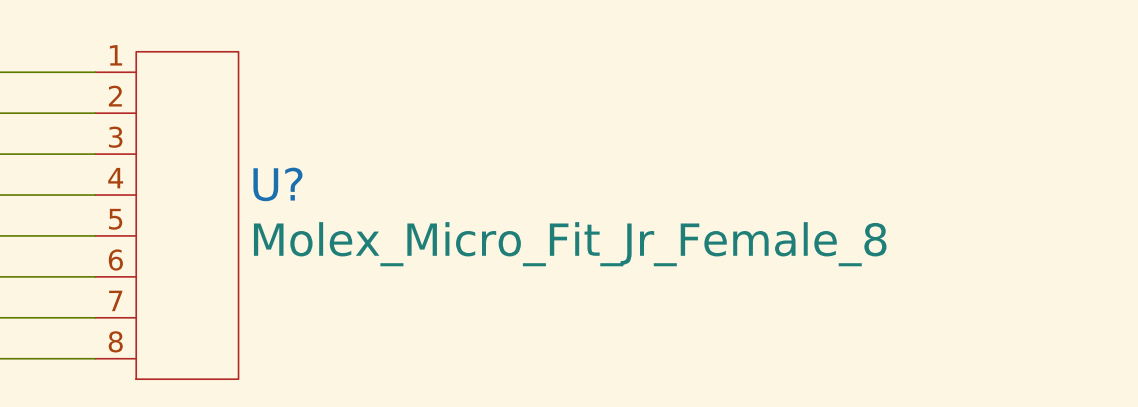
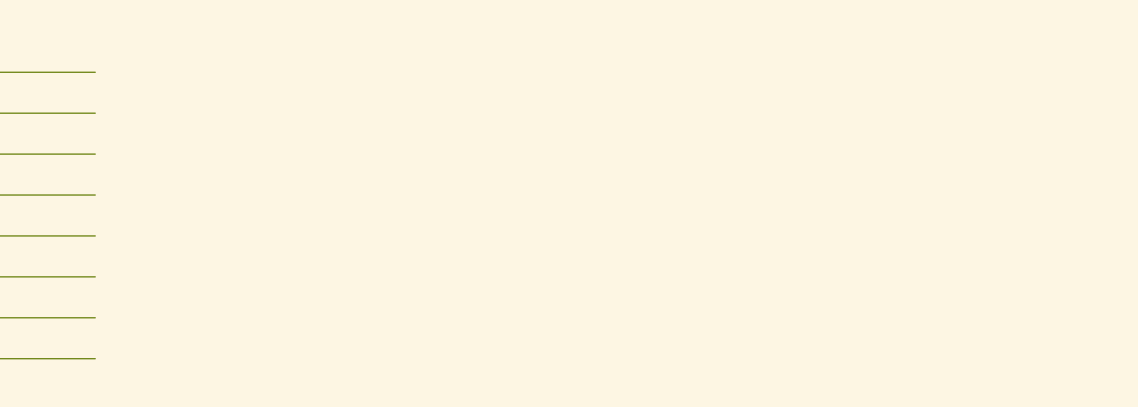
U?: Molex_Micro_Fit_Jr_Female_8 (166, 215) -> none

